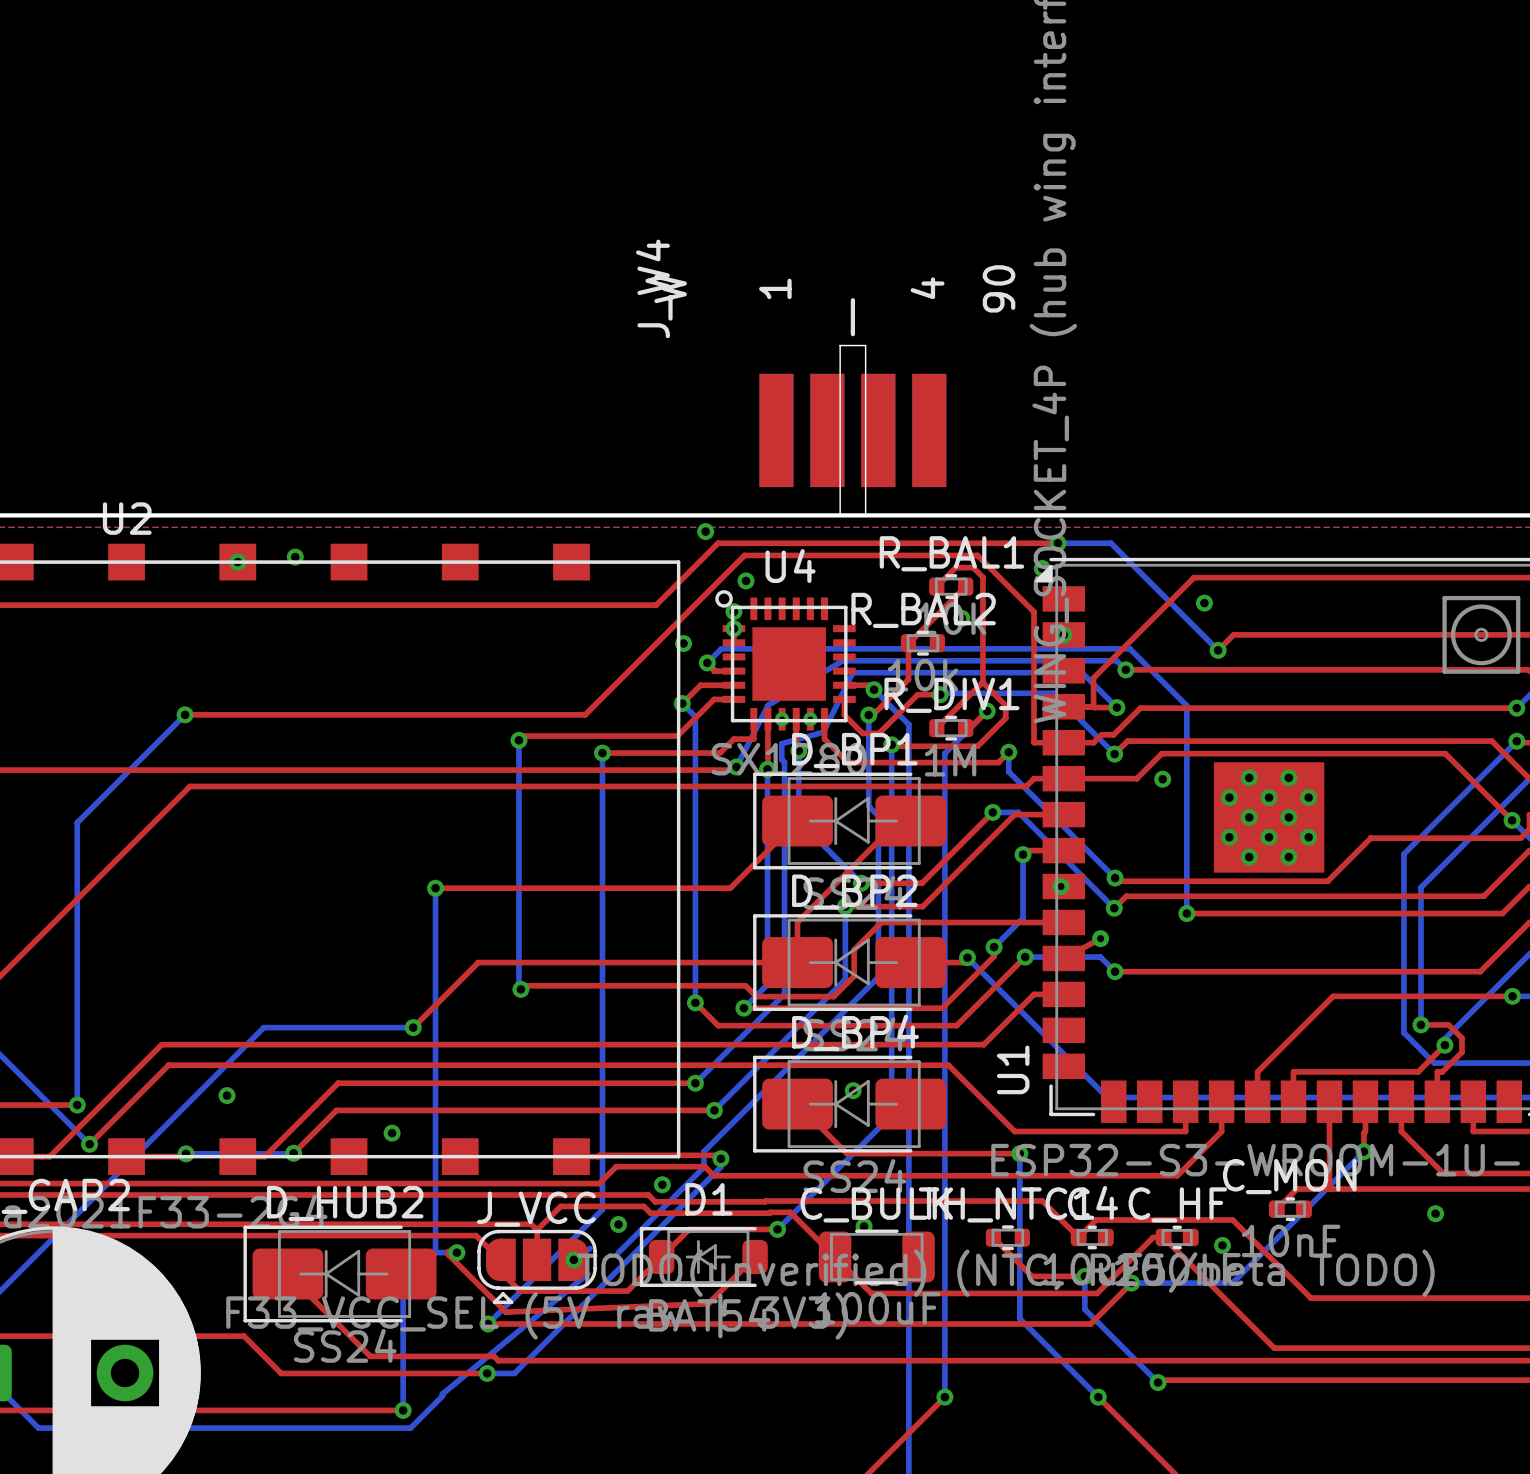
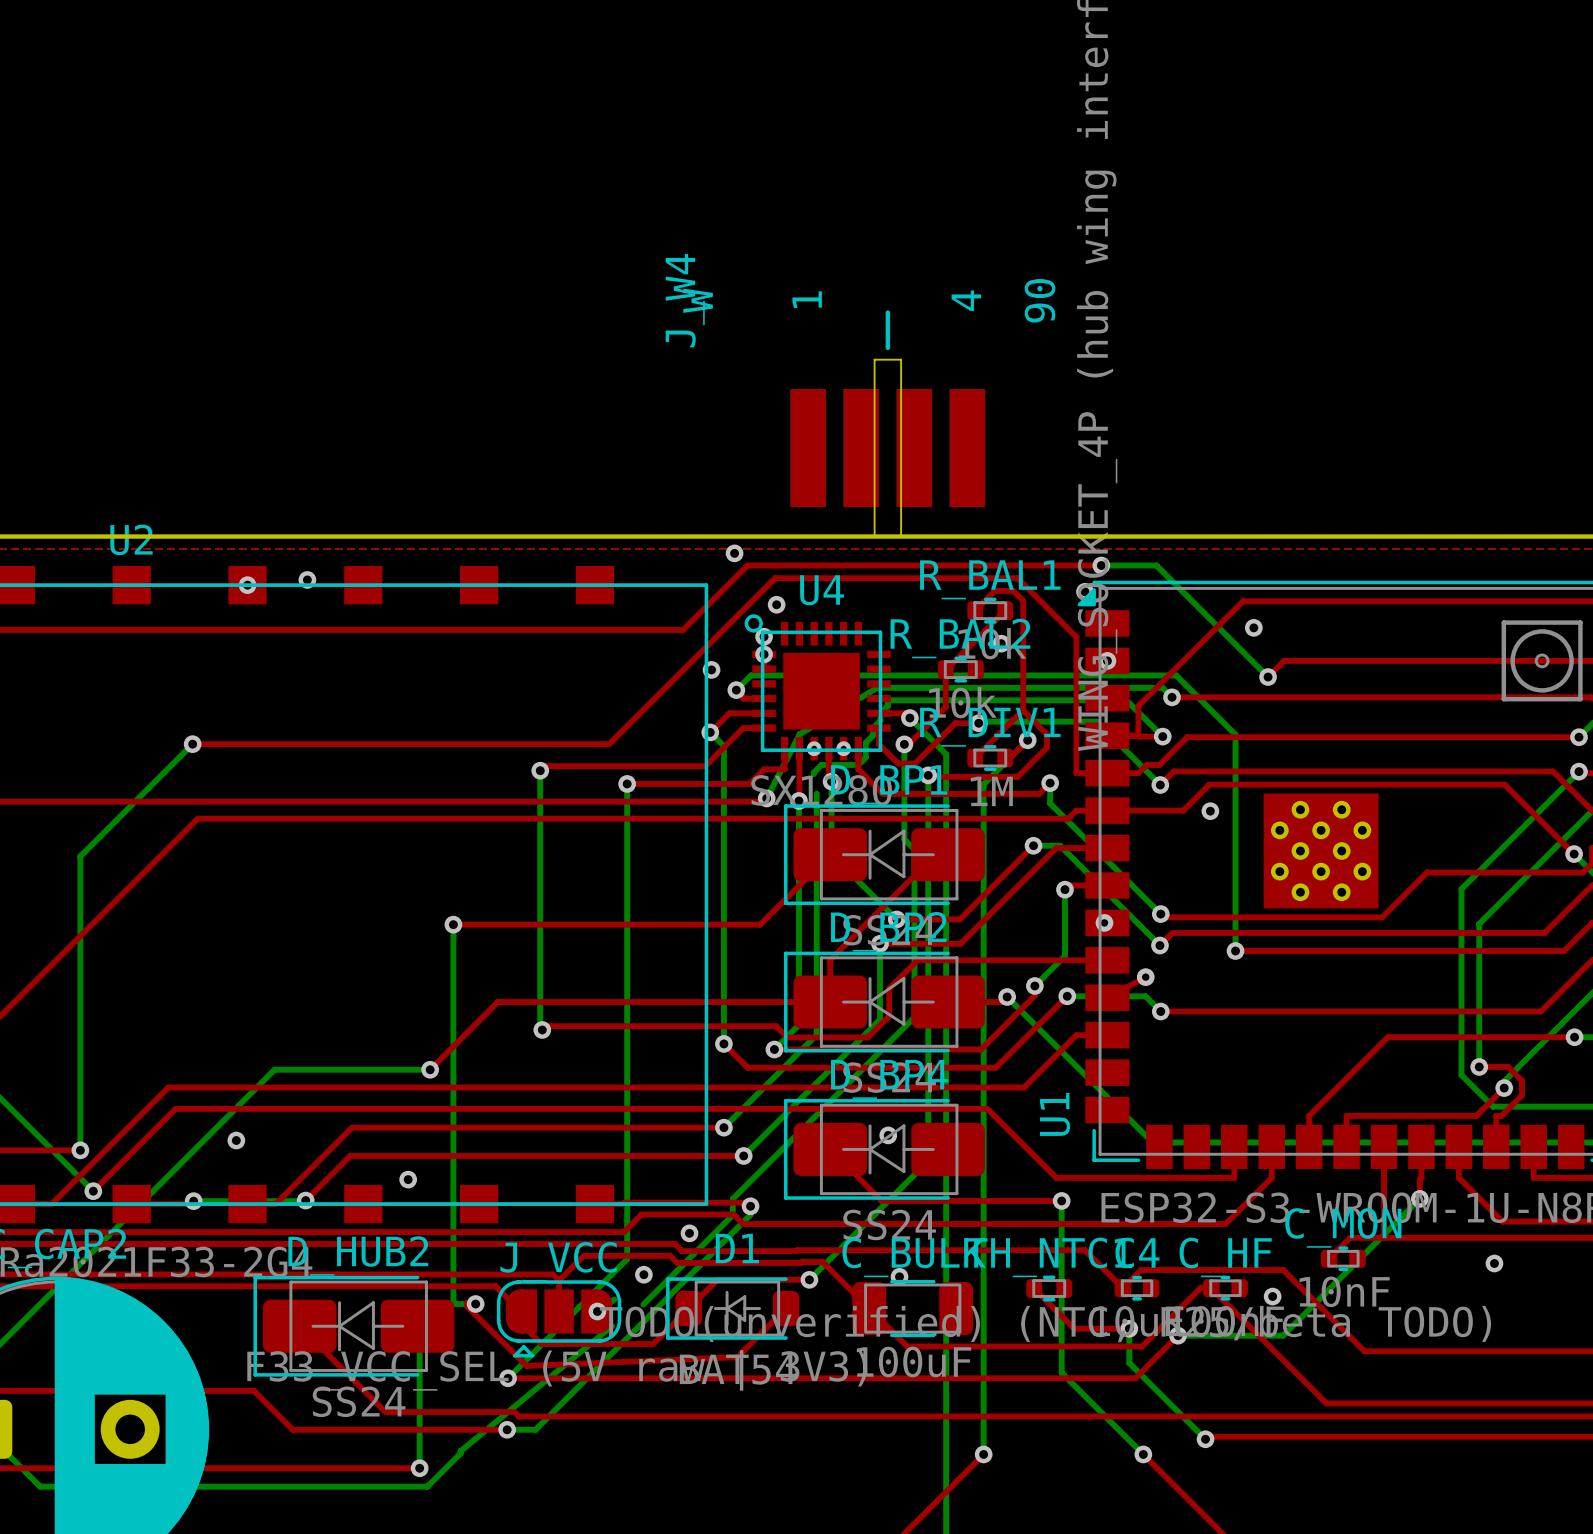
bottom track: (852, 672) (823, 732) (781, 743) (781, 759) (784, 762) -> (887, 700) (887, 698) (887, 705) (880, 713) (880, 720) (873, 728) (873, 735) (865, 742) (865, 757) (858, 764) (821, 764) (813, 774)

